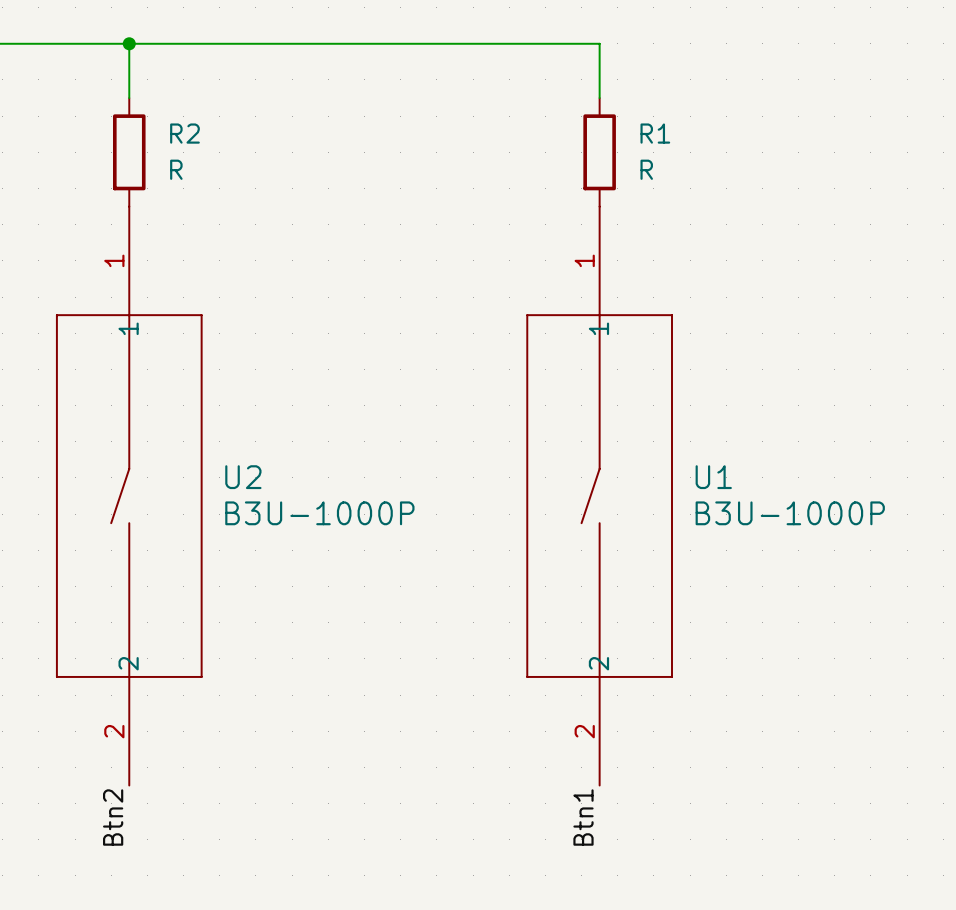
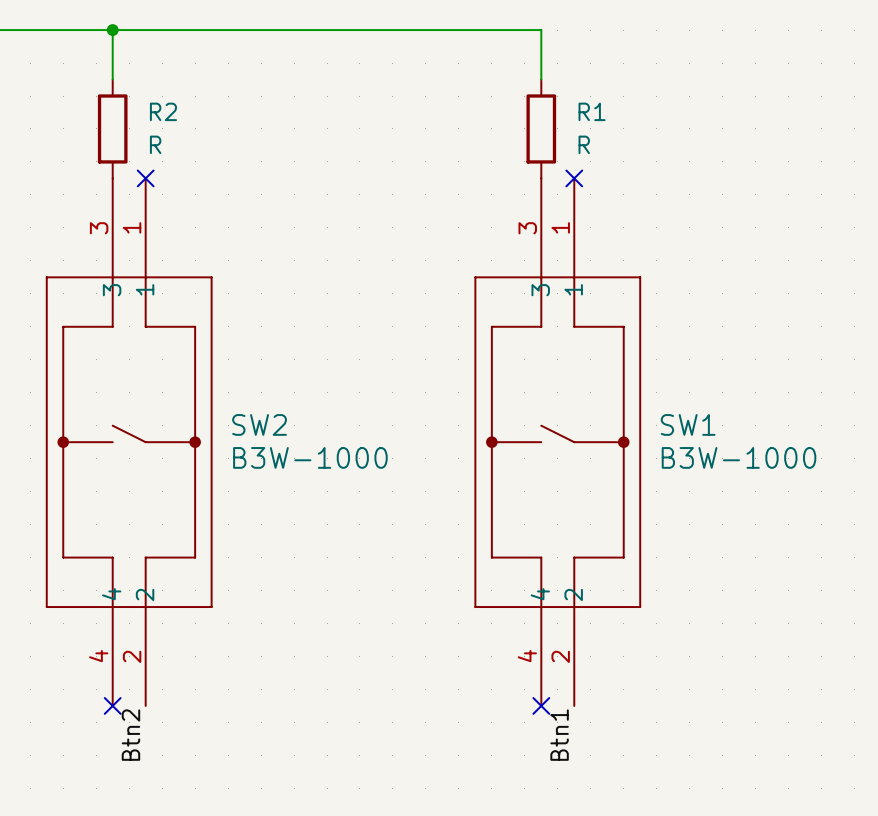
no-connect mark: none -> (145, 178)
no-connect mark: none -> (574, 178)
U2: B3U-1000P (129, 496) -> none
SW2: none -> B3W-1000 (129, 442)
U1: B3U-1000P (599, 496) -> none
SW1: none -> B3W-1000 (557, 442)
no-connect mark: none -> (112, 705)
no-connect mark: none -> (541, 705)
label position: Btn2 (113, 817) -> Btn2 (130, 735)
label position: Btn1 (583, 817) -> Btn1 (559, 735)

